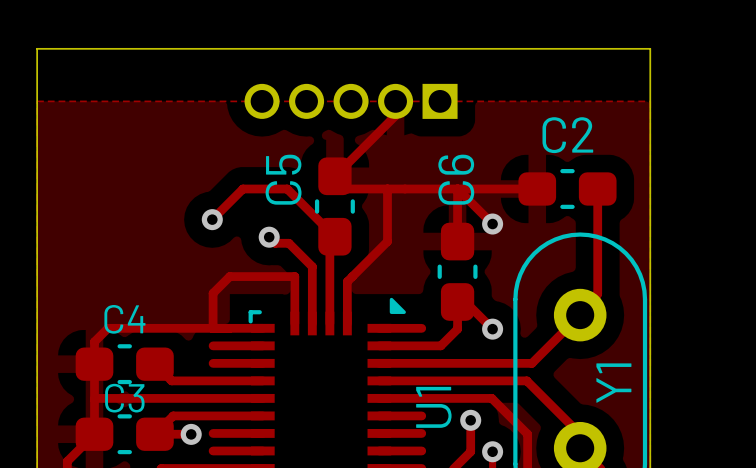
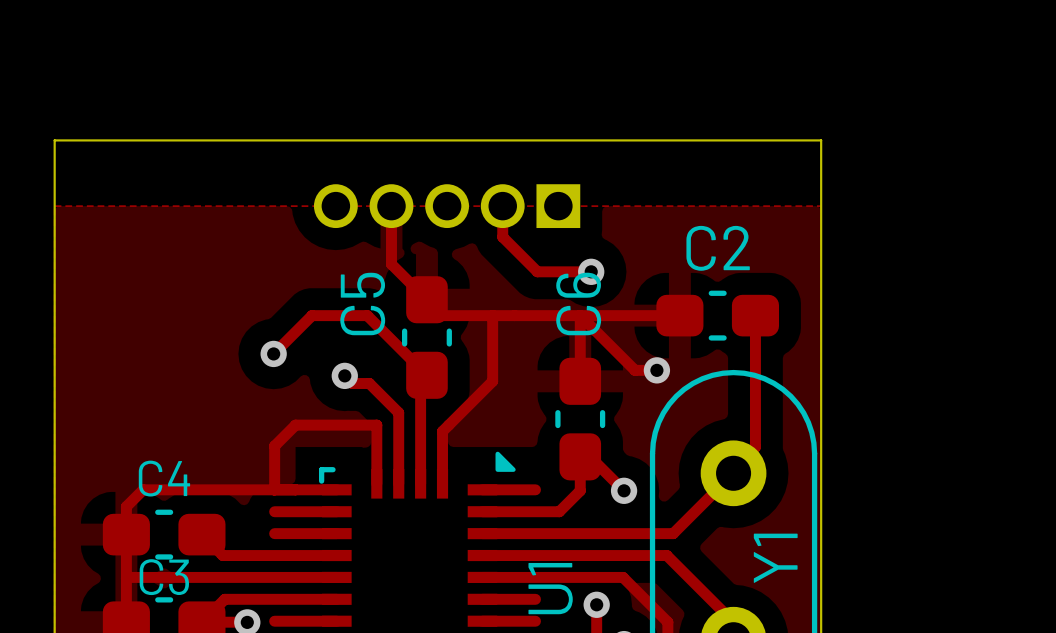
track: (395, 115) (334, 176) -> (391, 206) (391, 264) (426, 299)
track: none -> (502, 223) (502, 237) (537, 271) (591, 271)
via: none -> (591, 271)
track: none -> (624, 359) (635, 370) (656, 370)
via position: (492, 224) -> (656, 370)

